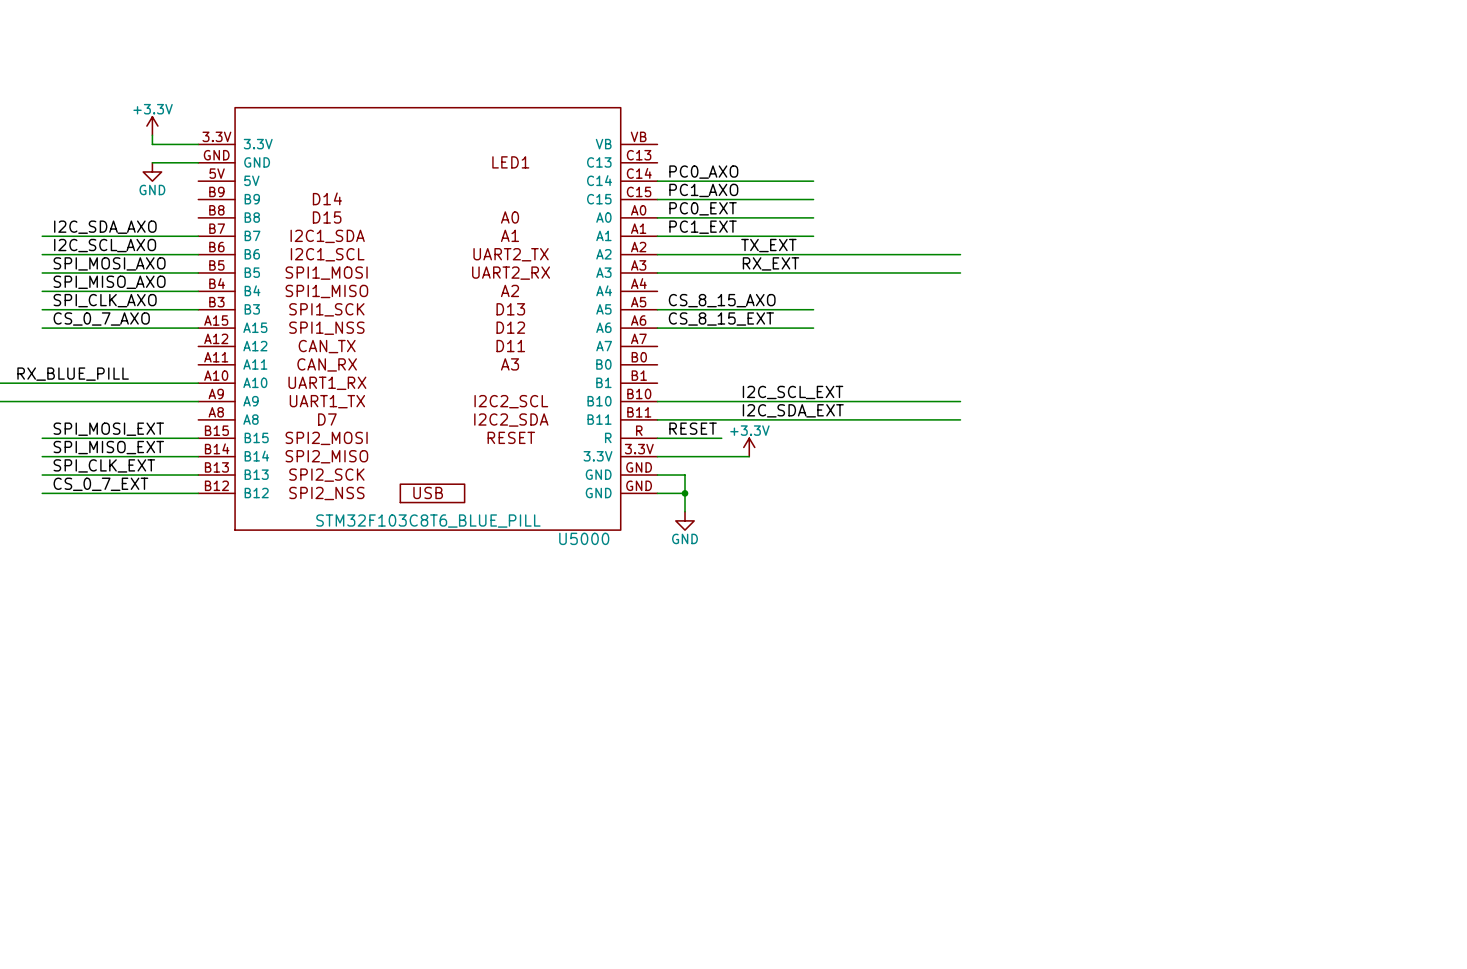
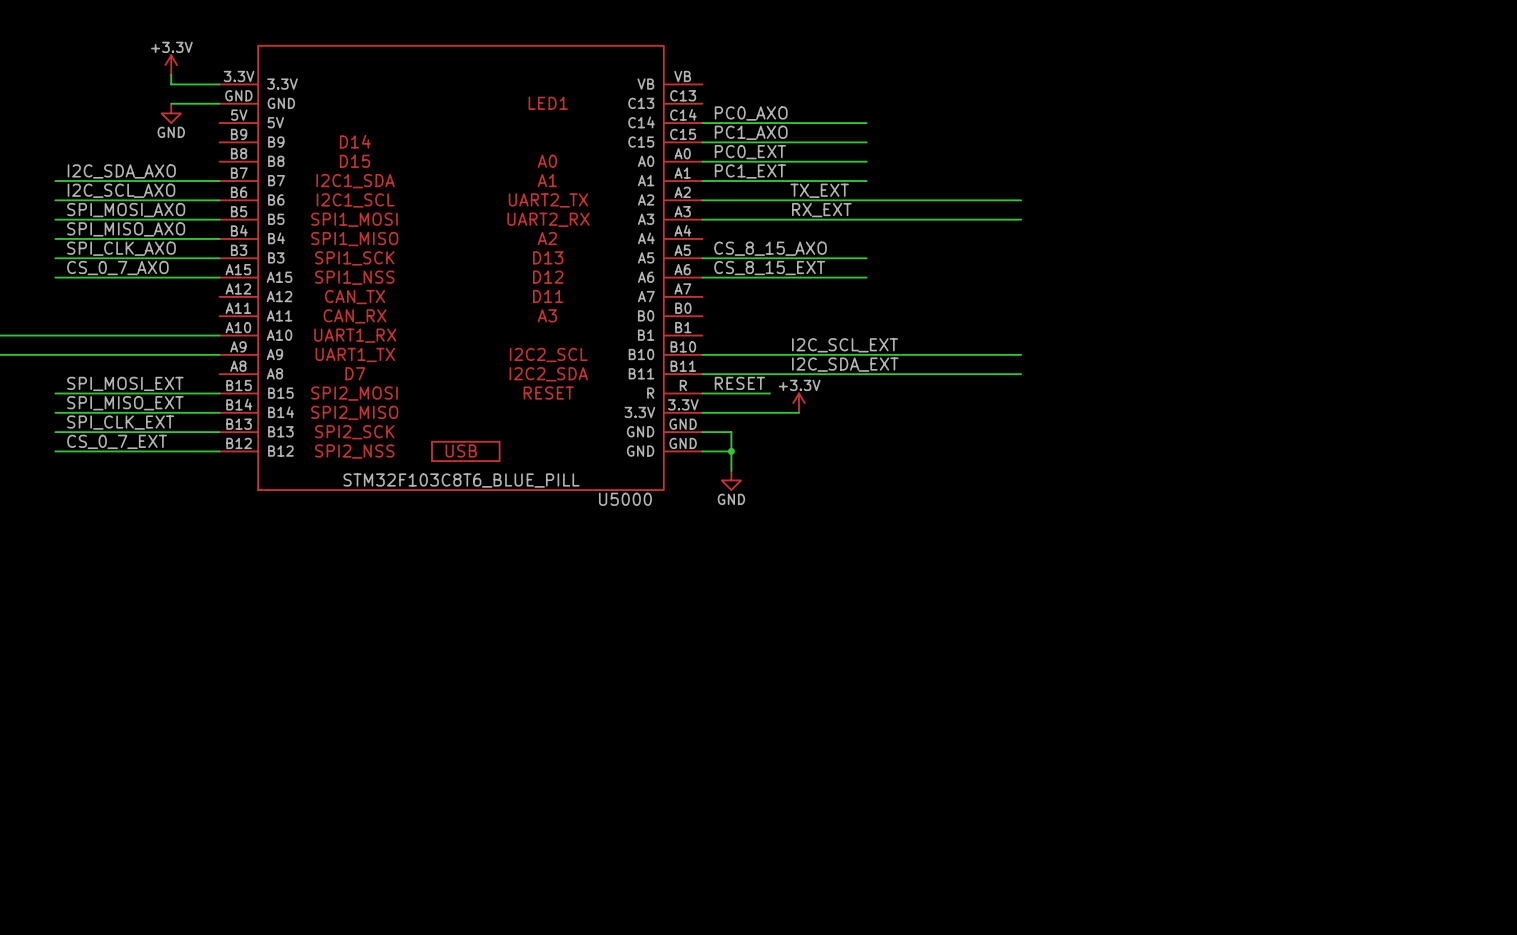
label: RX_BLUE_PILL (73, 374) -> none

